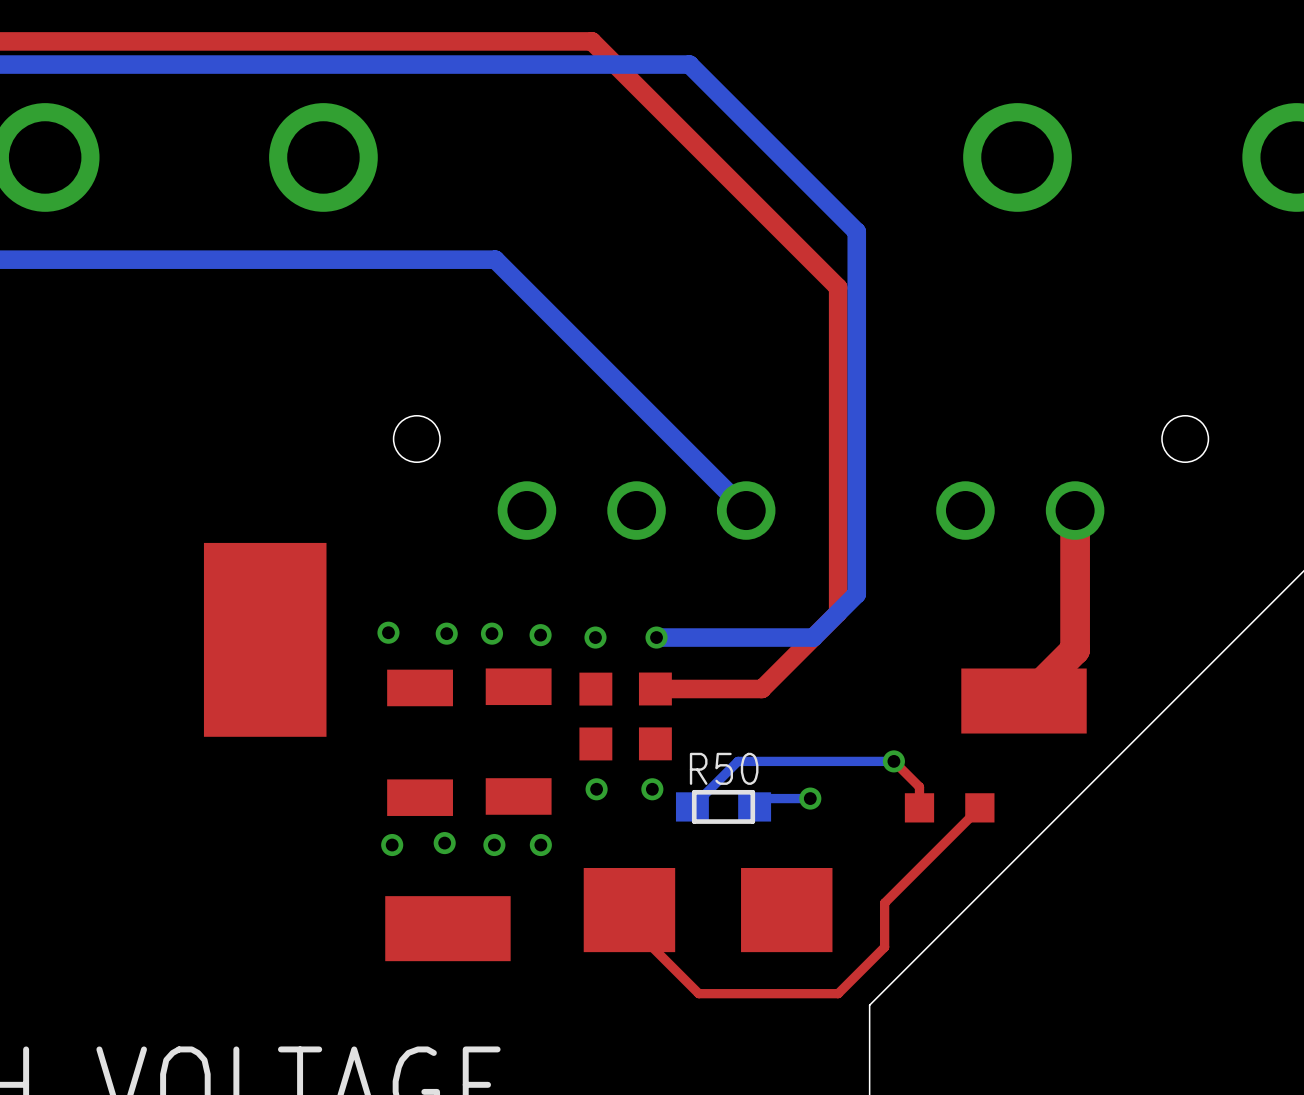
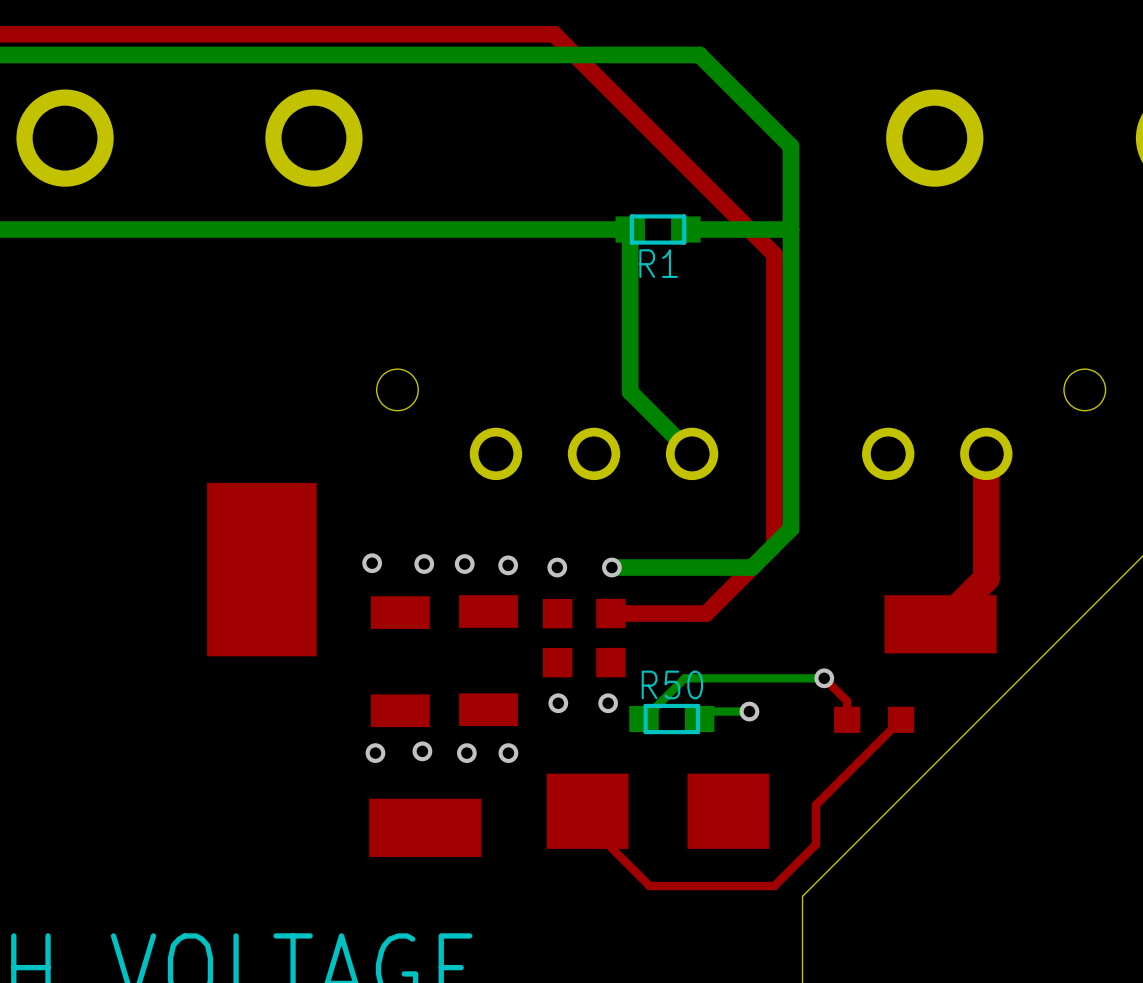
bottom track: (689, 64) (856, 231) -> (641, 54) (699, 54) (791, 146) (791, 204)
bottom track: (495, 259) (677, 441) -> (467, 229) (630, 229) (630, 392)
R1: none -> (658, 229)
bottom track: none -> (791, 229) (685, 229)

